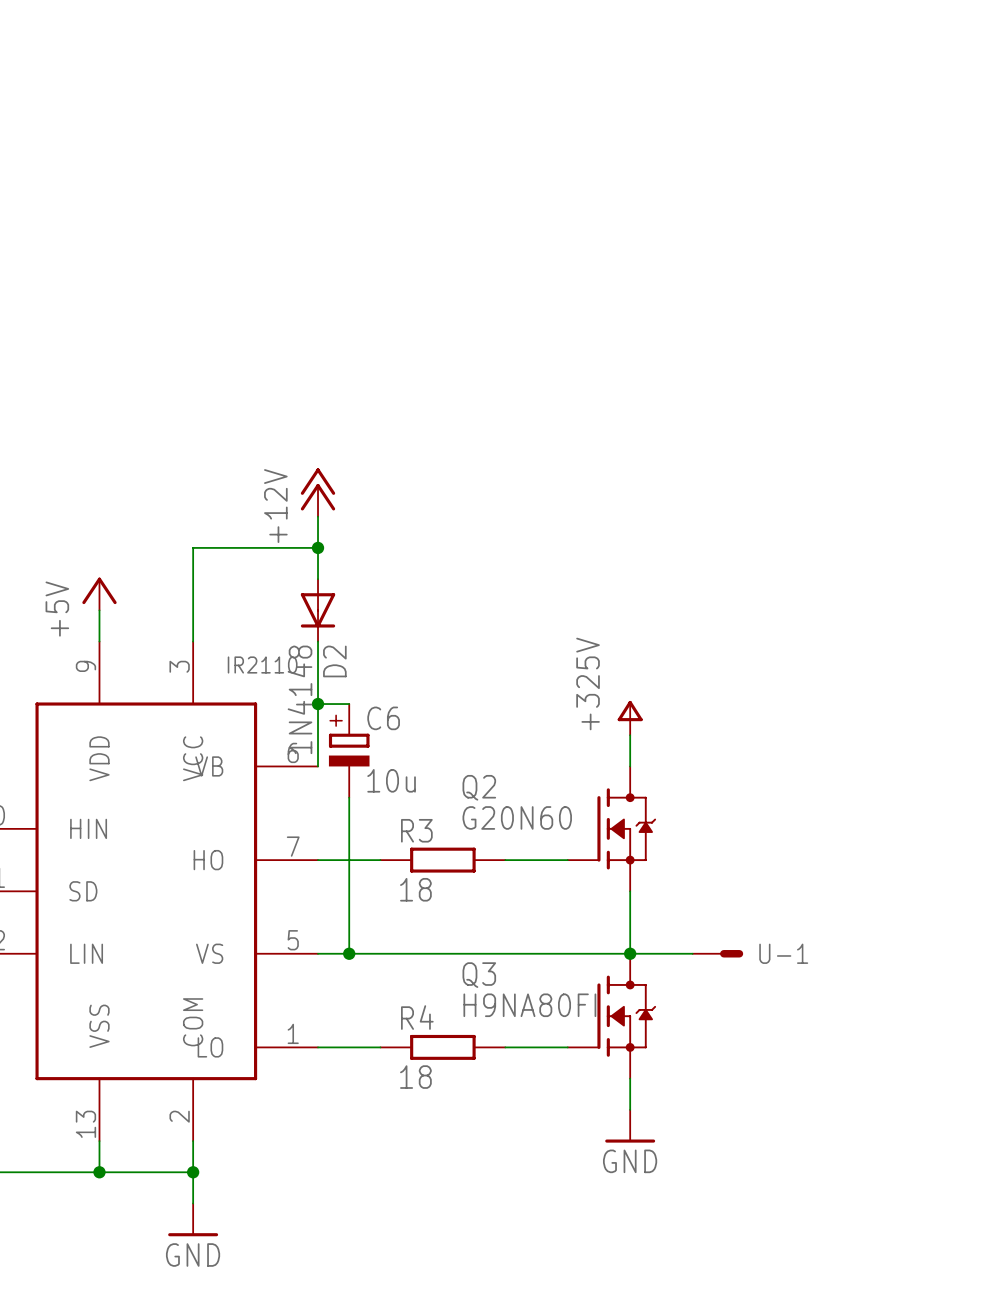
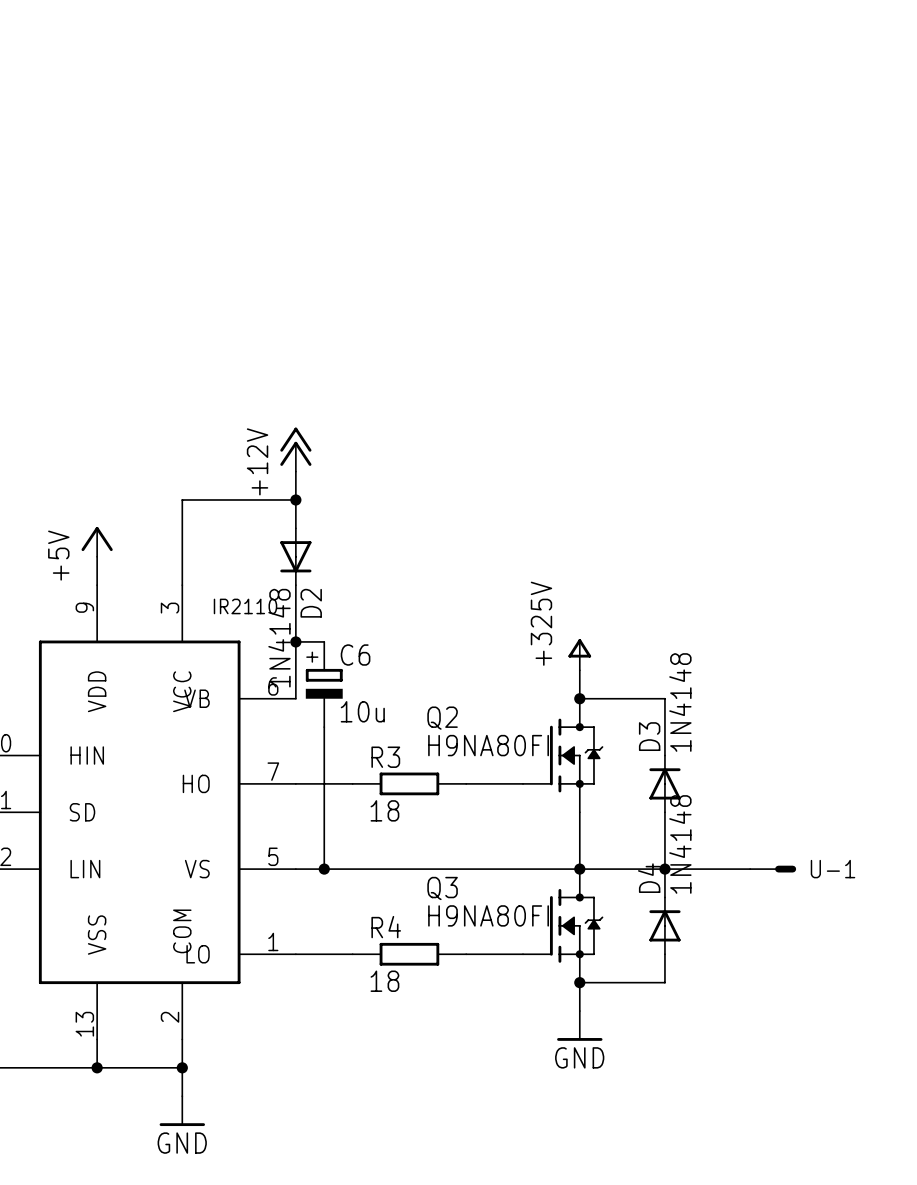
wire: none -> (579, 698) (664, 698) (664, 755)
junction: none -> (579, 698)
Q2 value: G20N60 (517, 817) -> H9NA80FI (488, 745)
D3: none -> 1N4148 (664, 783)
wire: none -> (664, 812) (664, 897)
wire: none -> (636, 869) (750, 869)
U-1 position: (717, 953) -> (773, 869)
junction: none -> (664, 869)
D4: none -> 1N4148 (664, 925)
wire: none -> (664, 954) (664, 982) (579, 982)
junction: none -> (579, 982)

